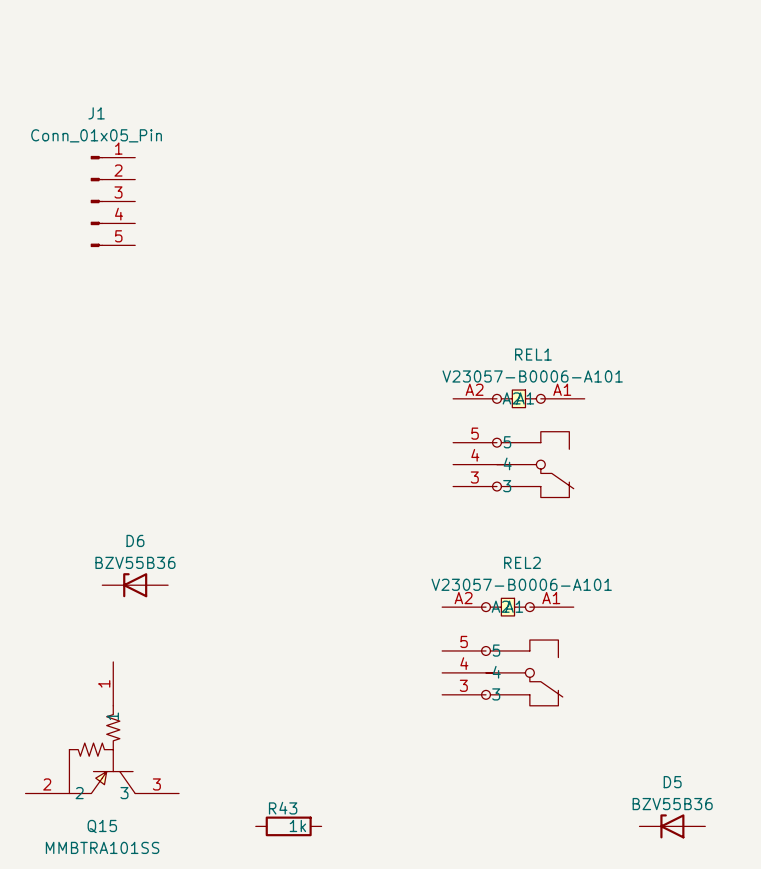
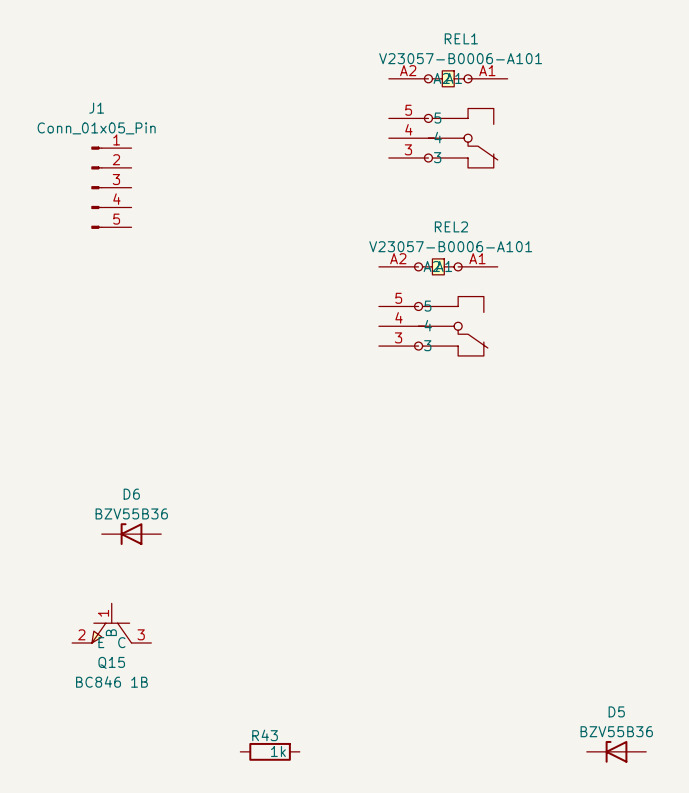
REL1 position: (518, 443) -> (448, 119)
REL2 position: (507, 652) -> (438, 307)
Q15 symbol: [25, 661, 180, 794] -> [72, 603, 152, 643]
Q15 name position: Q15 (102, 826) -> Q15 (111, 662)
Q15 value: MMBTRA101SS (102, 847) -> BC846 1B (111, 681)

